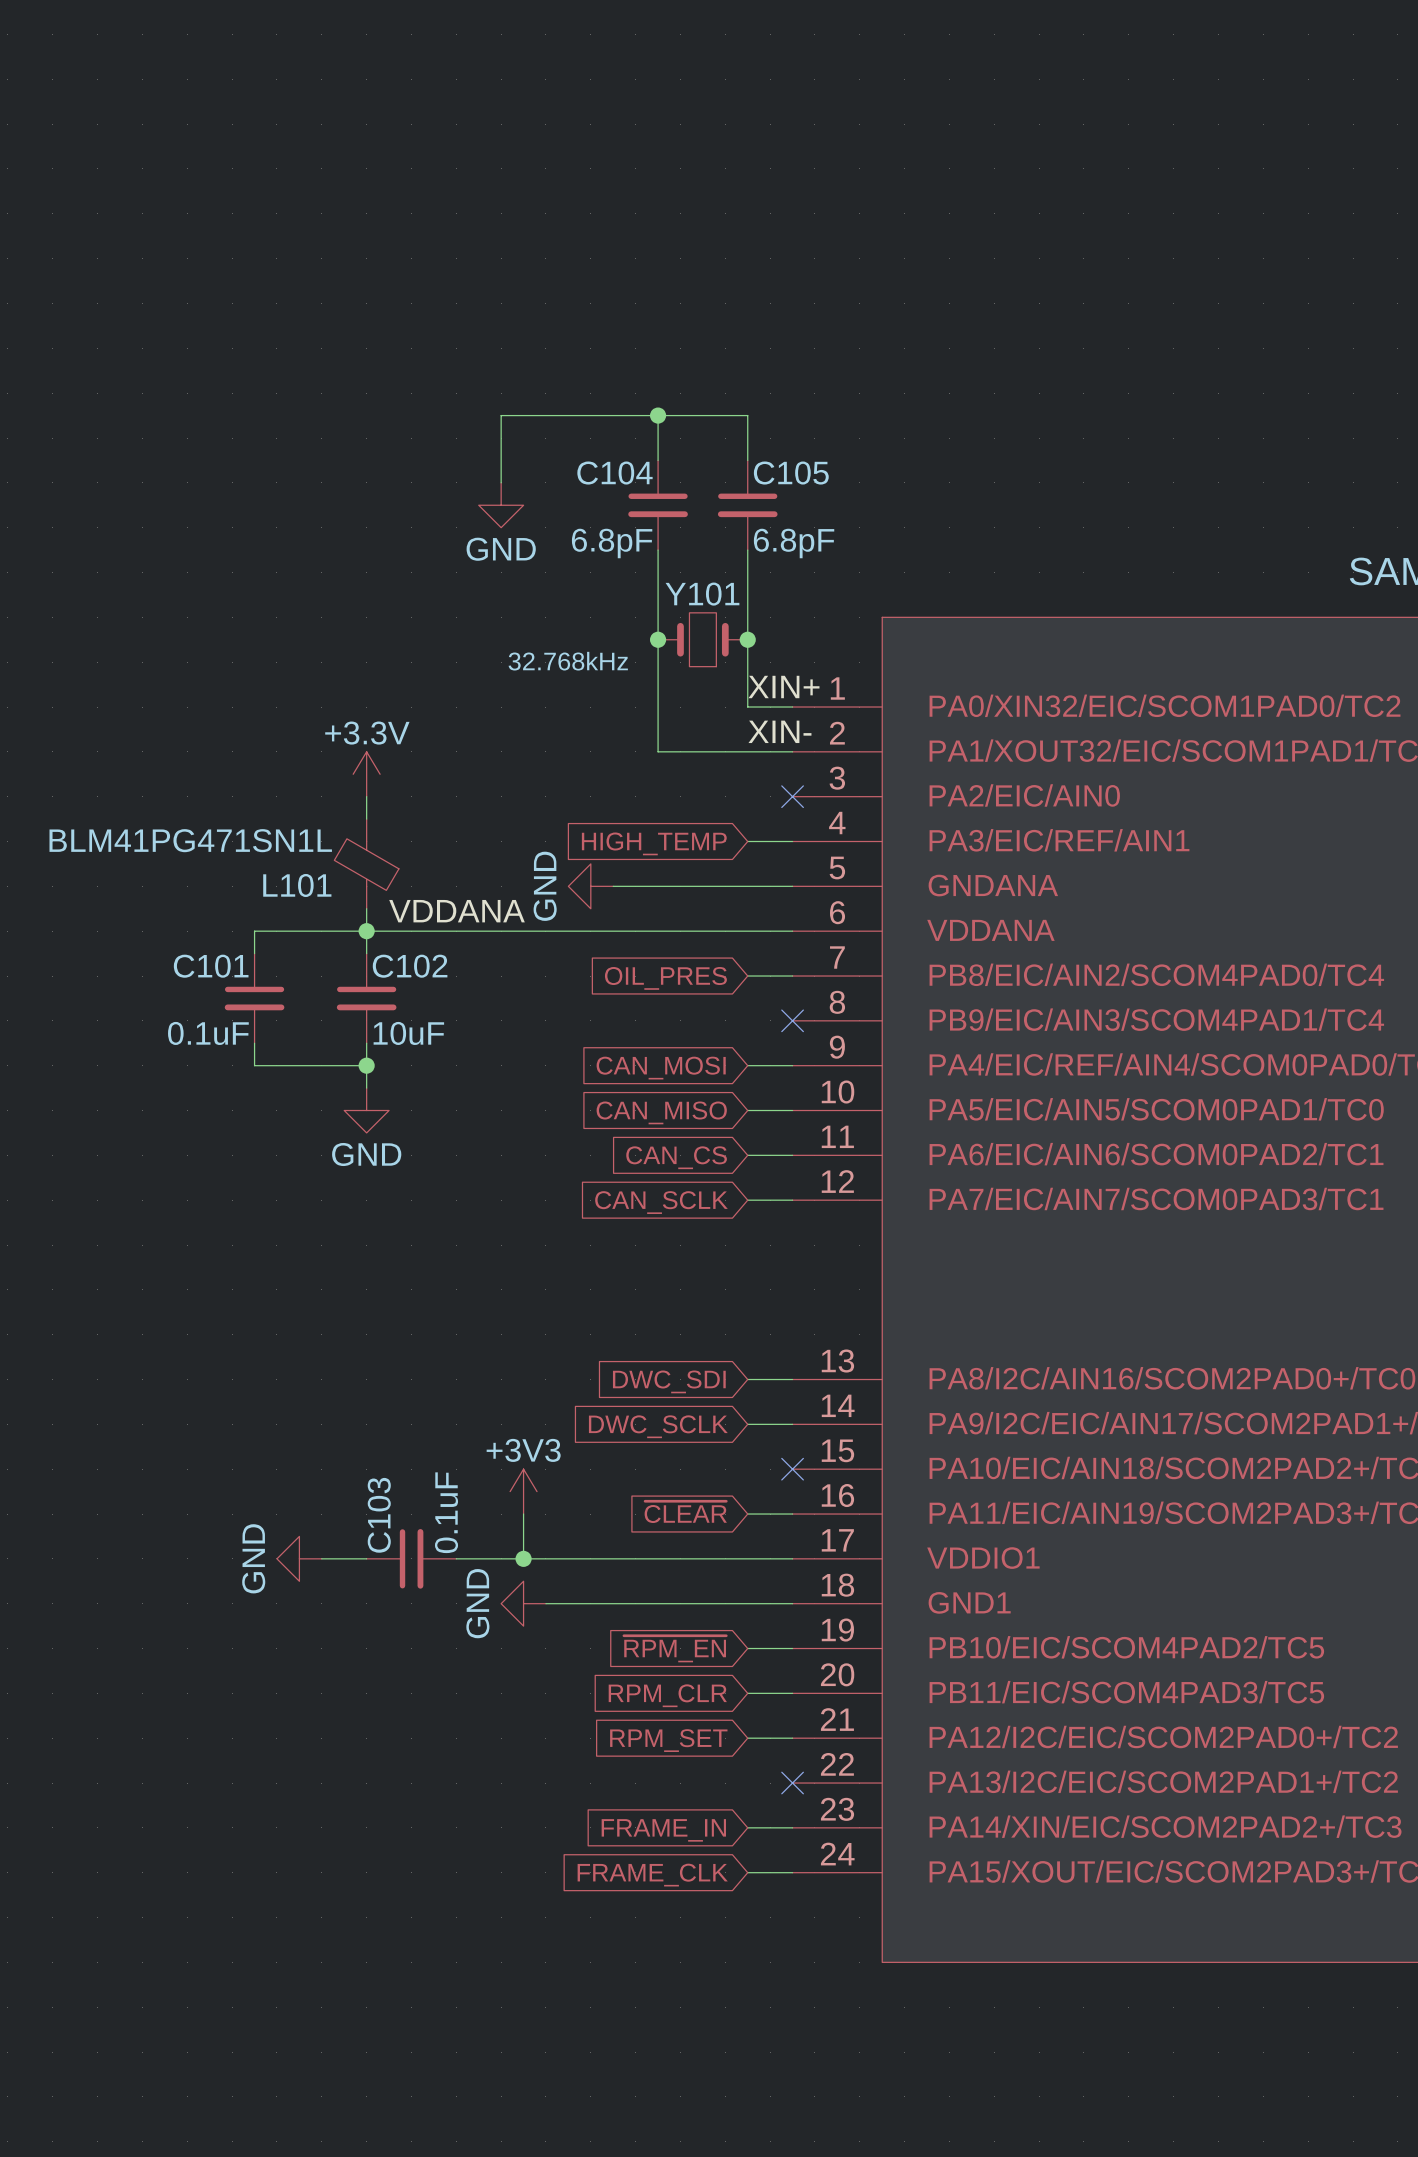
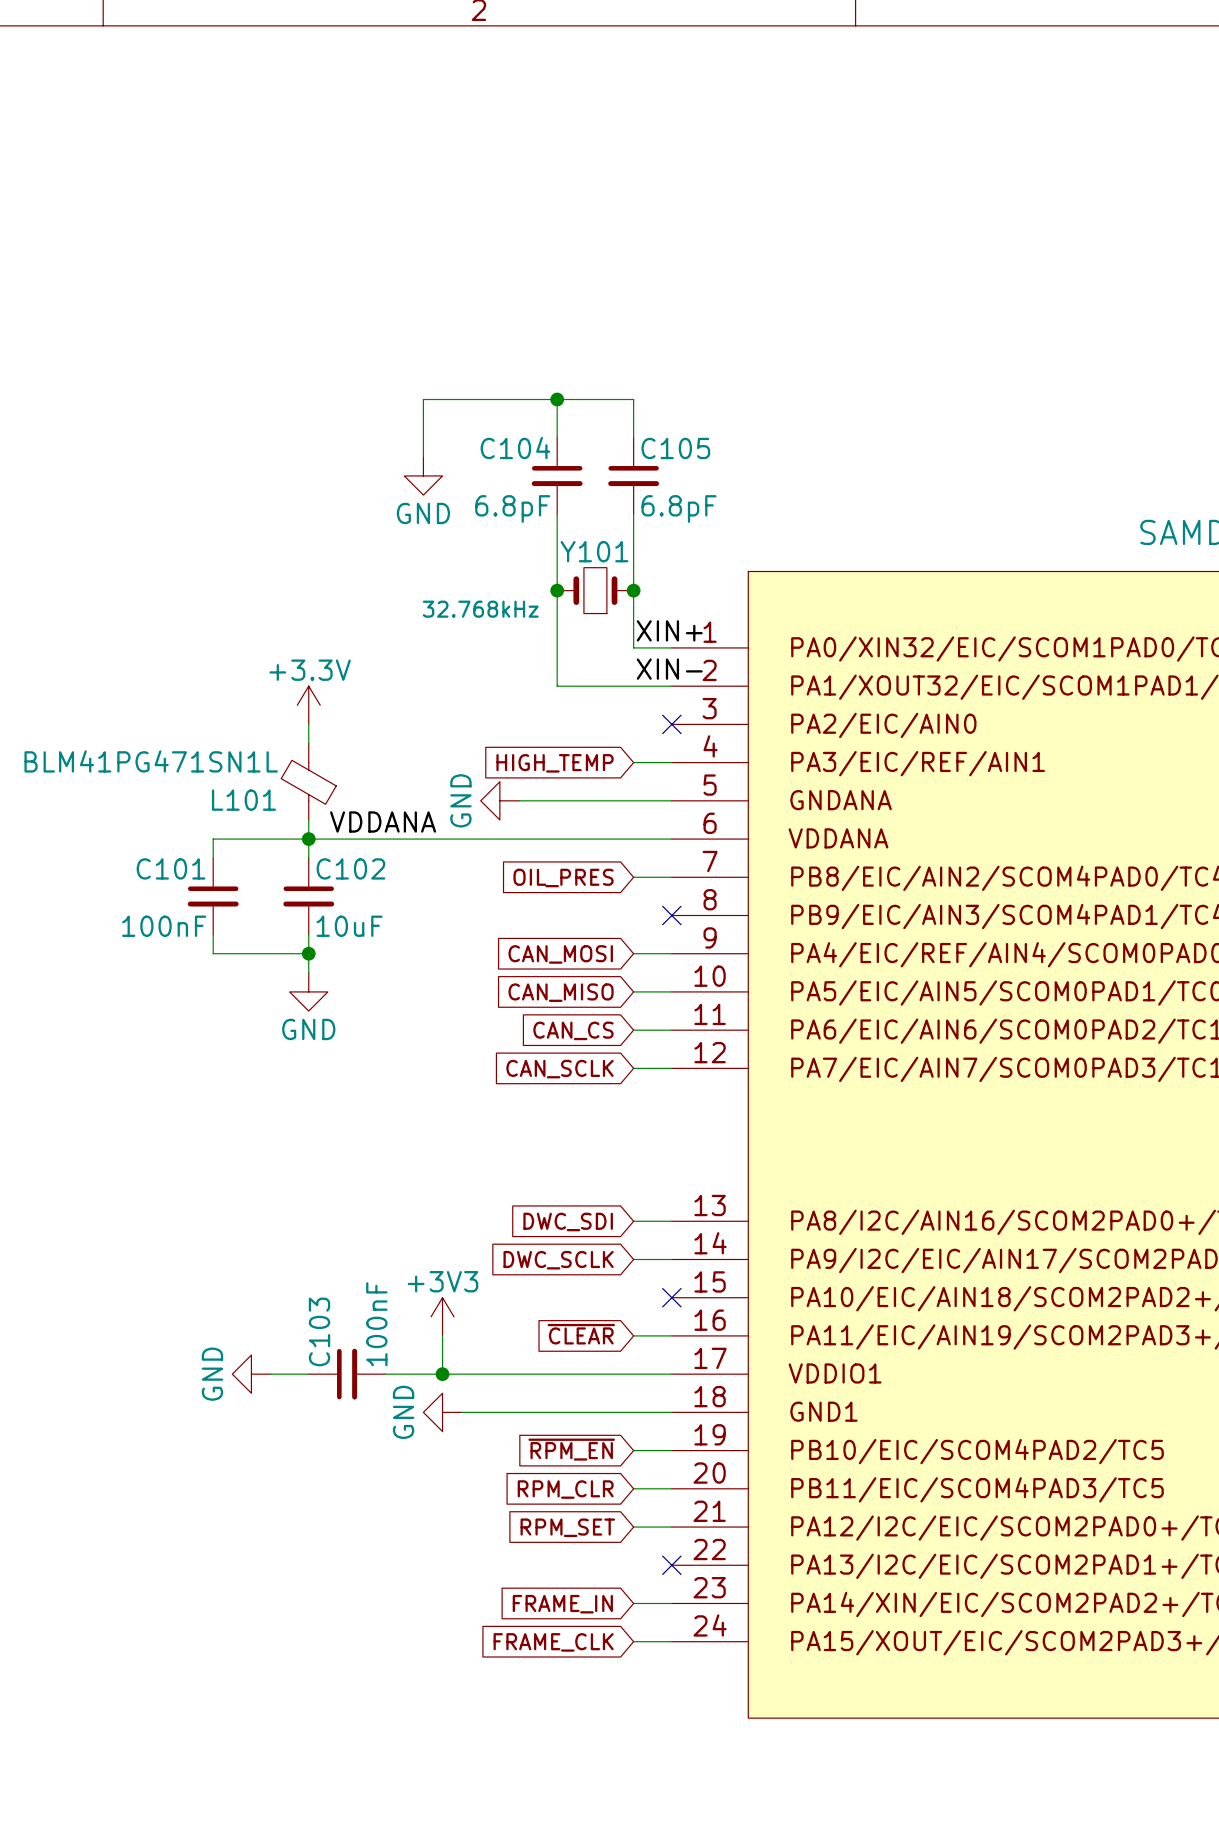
C101 value: 0.1uF (208, 1033) -> 100nF (164, 926)
C103 value: 0.1uF (446, 1512) -> 100nF (376, 1324)

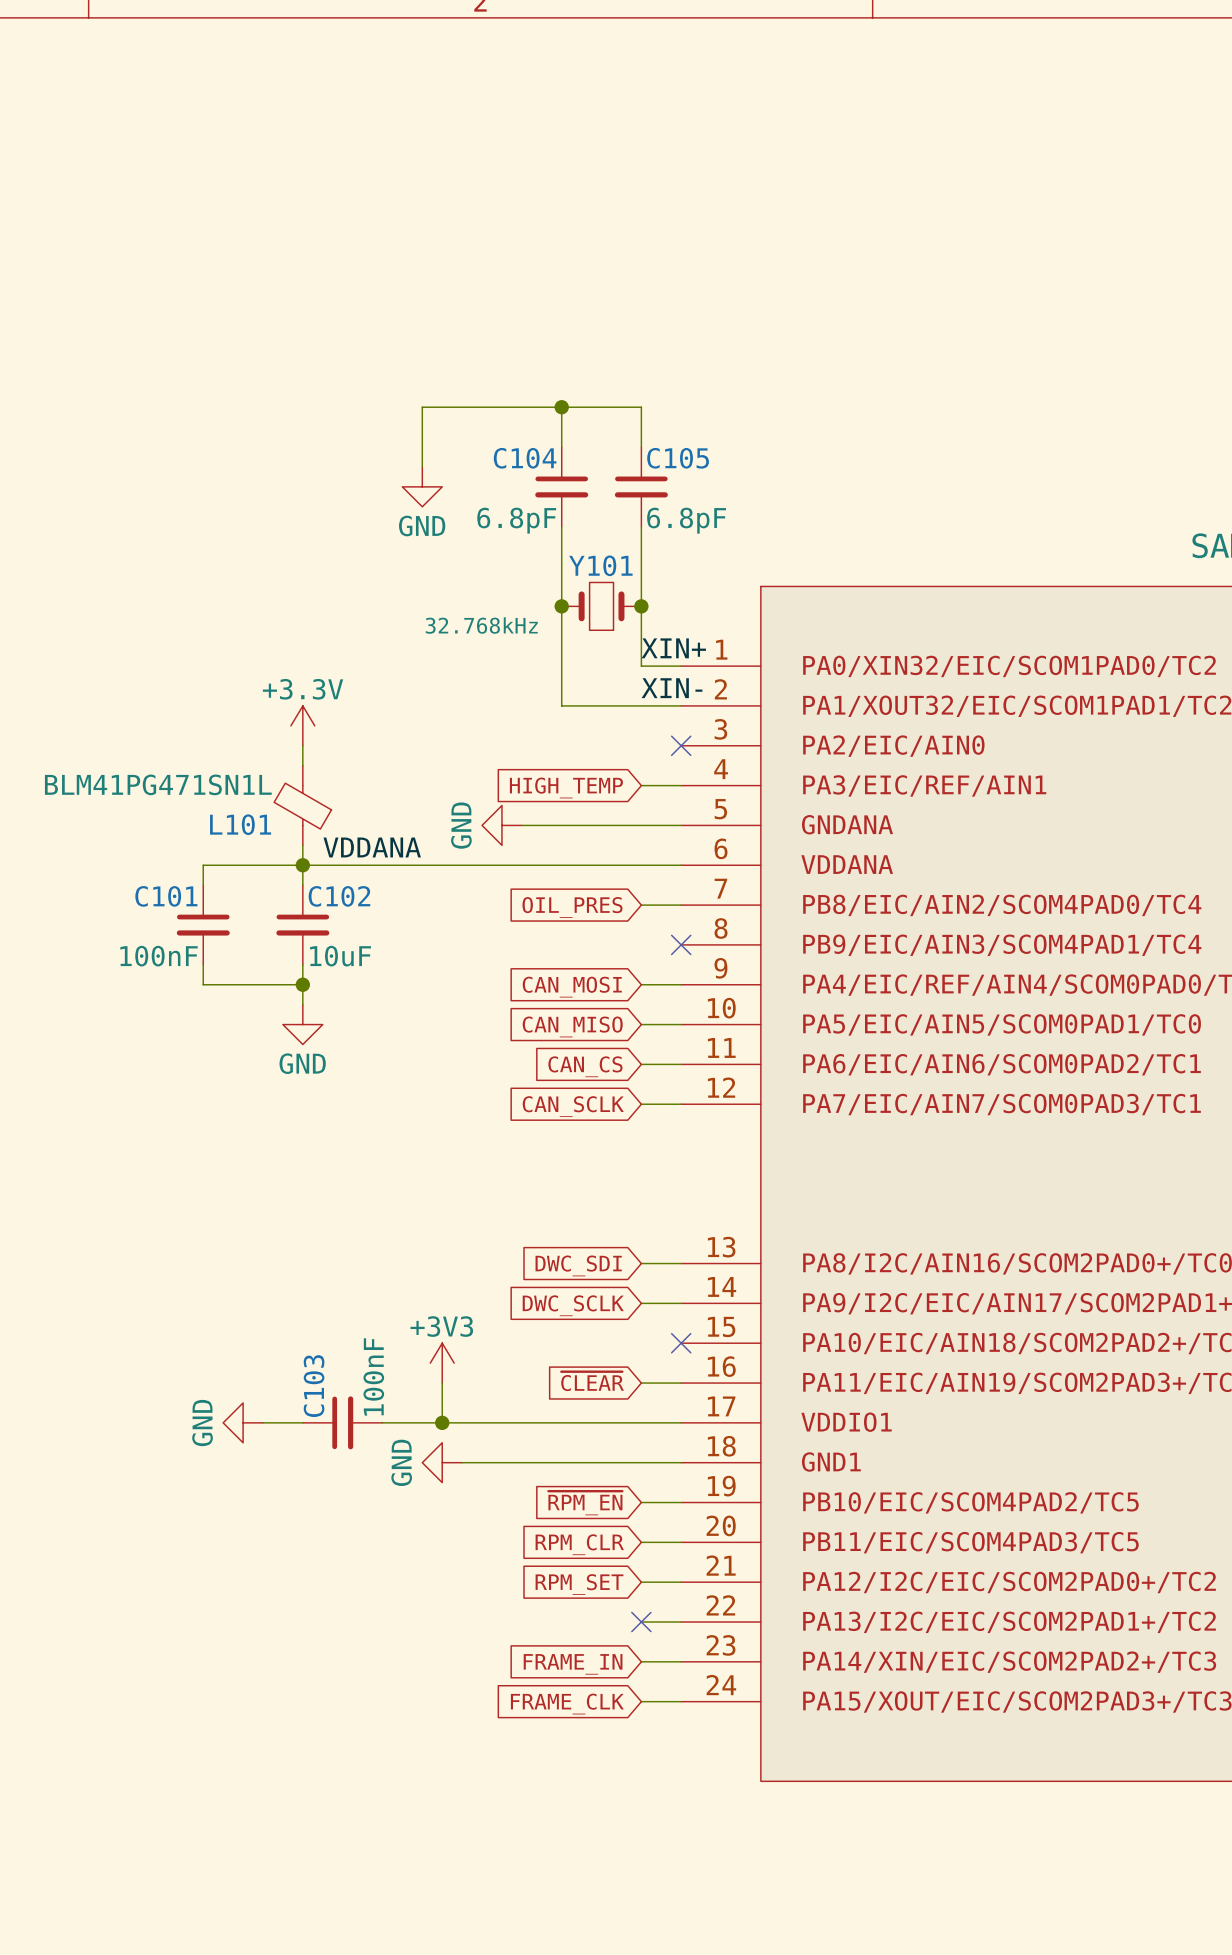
wire: none -> (641, 1622) (681, 1622)
no-connect mark position: (671, 1565) -> (641, 1622)

